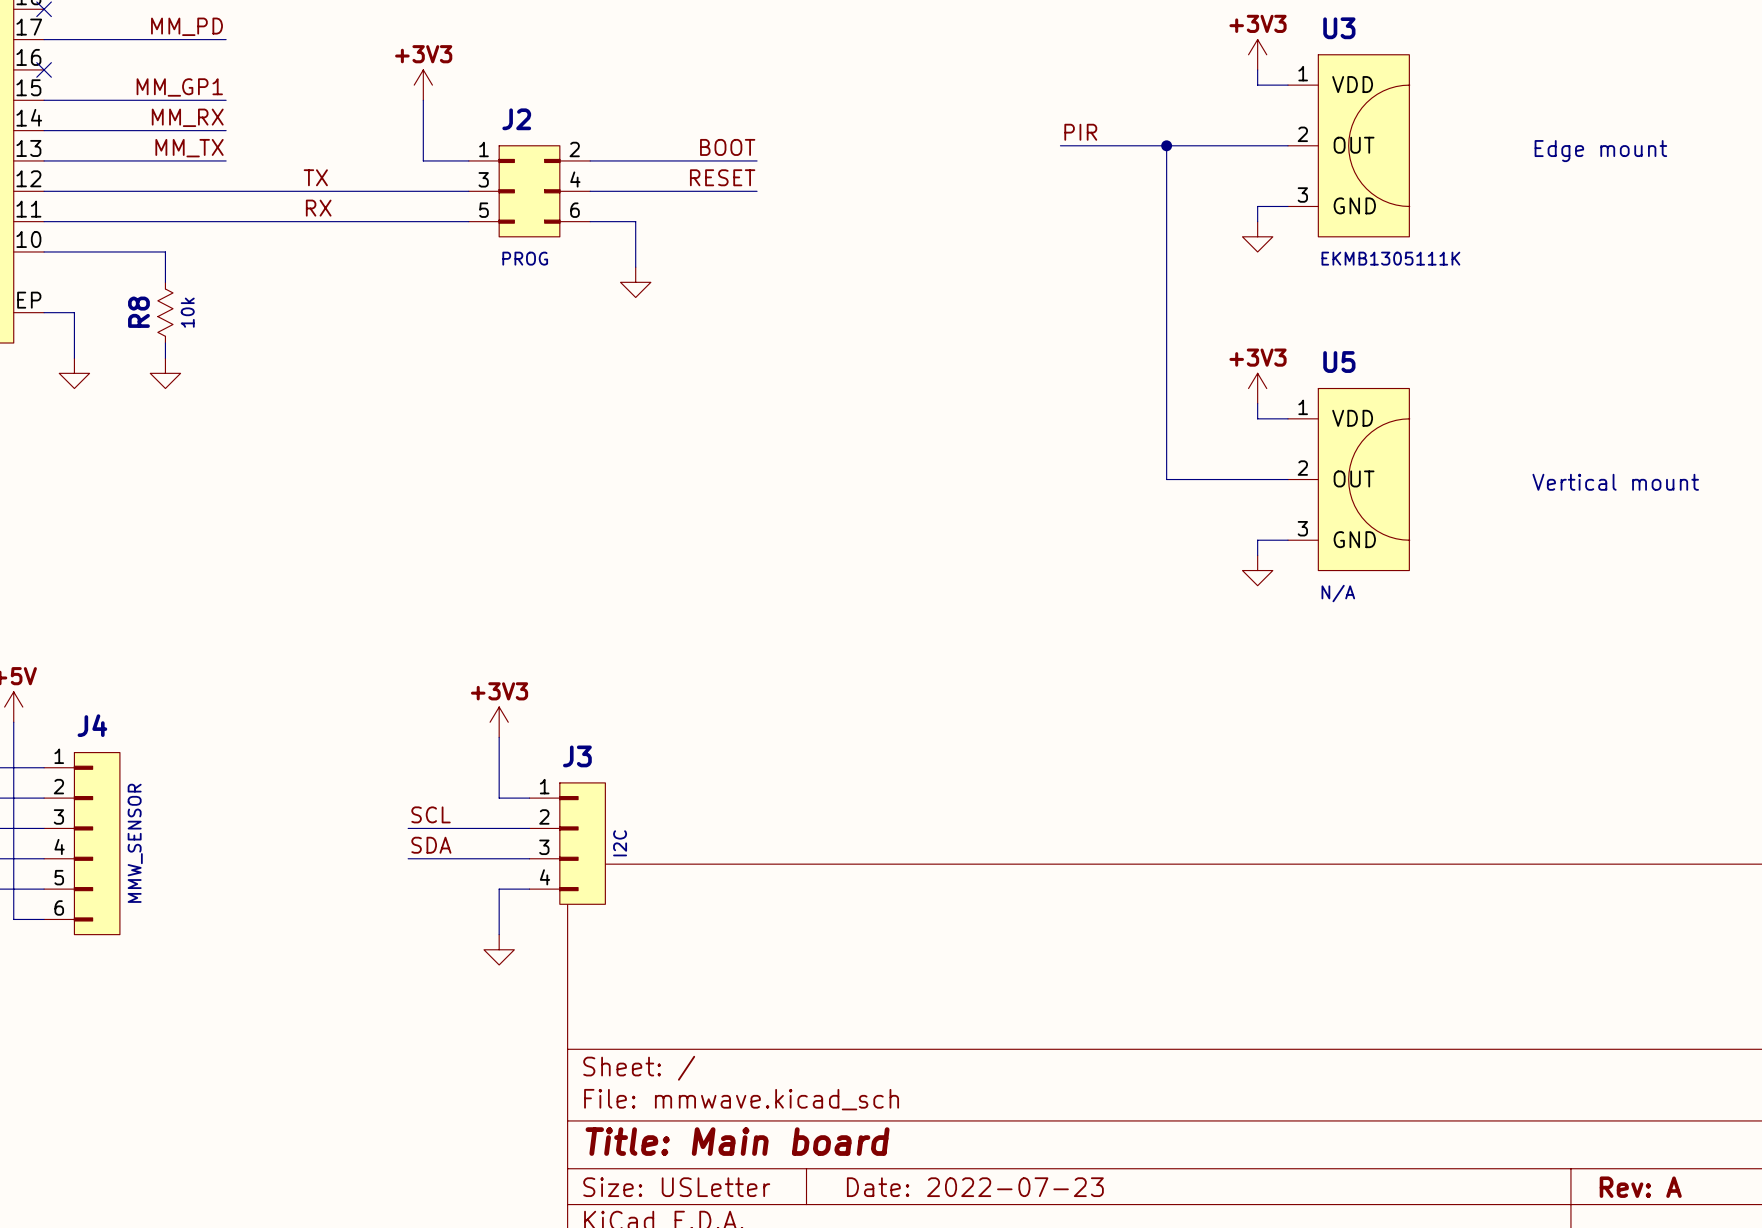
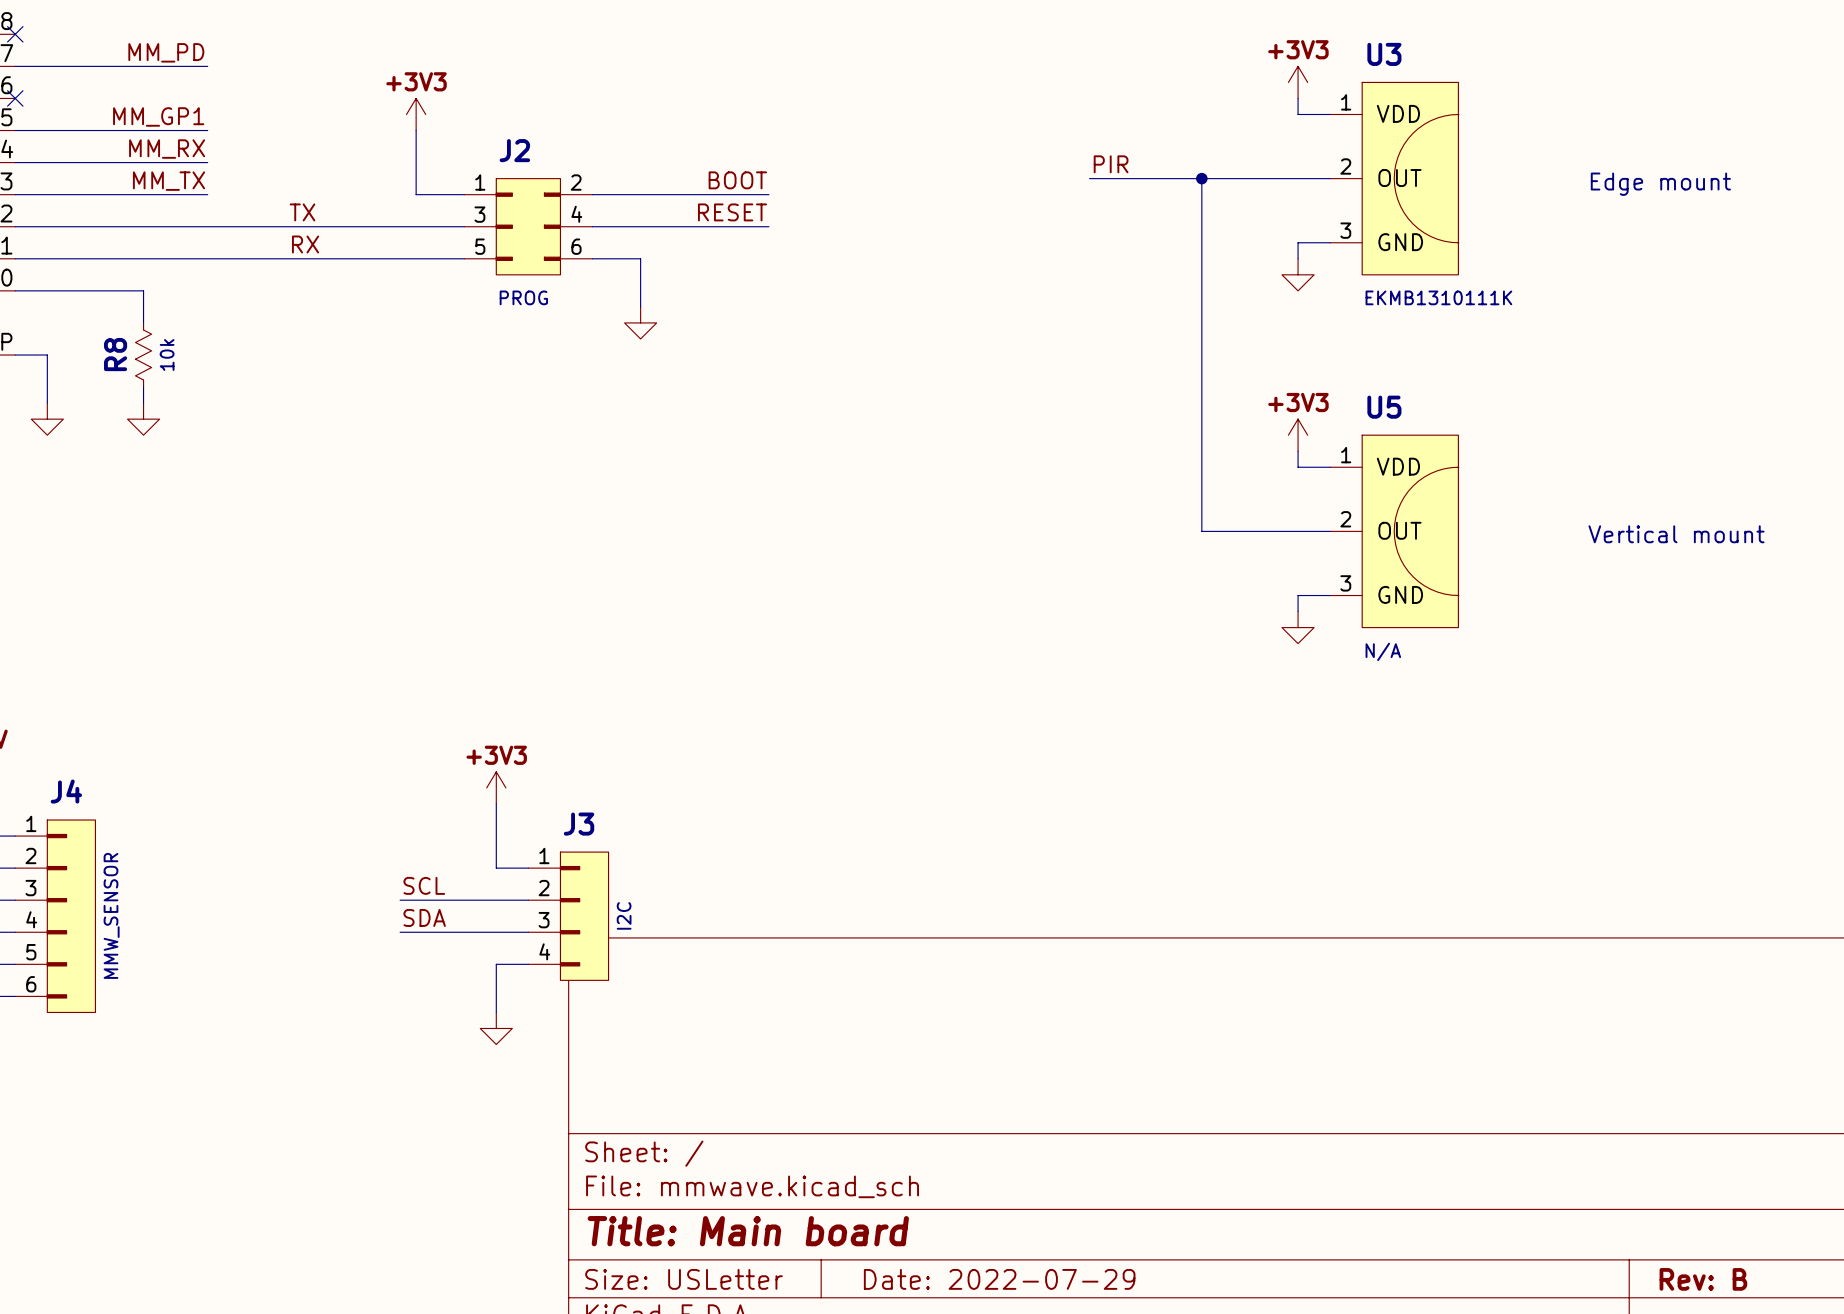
U3 value: EKMB1305111K (1390, 258) -> EKMB1310111K (1438, 297)
title block: Date: 2022-07-23 (975, 1187) -> Date: 2022-07-29 (999, 1279)
title block: Rev: A (1640, 1187) -> Rev: B (1703, 1279)

